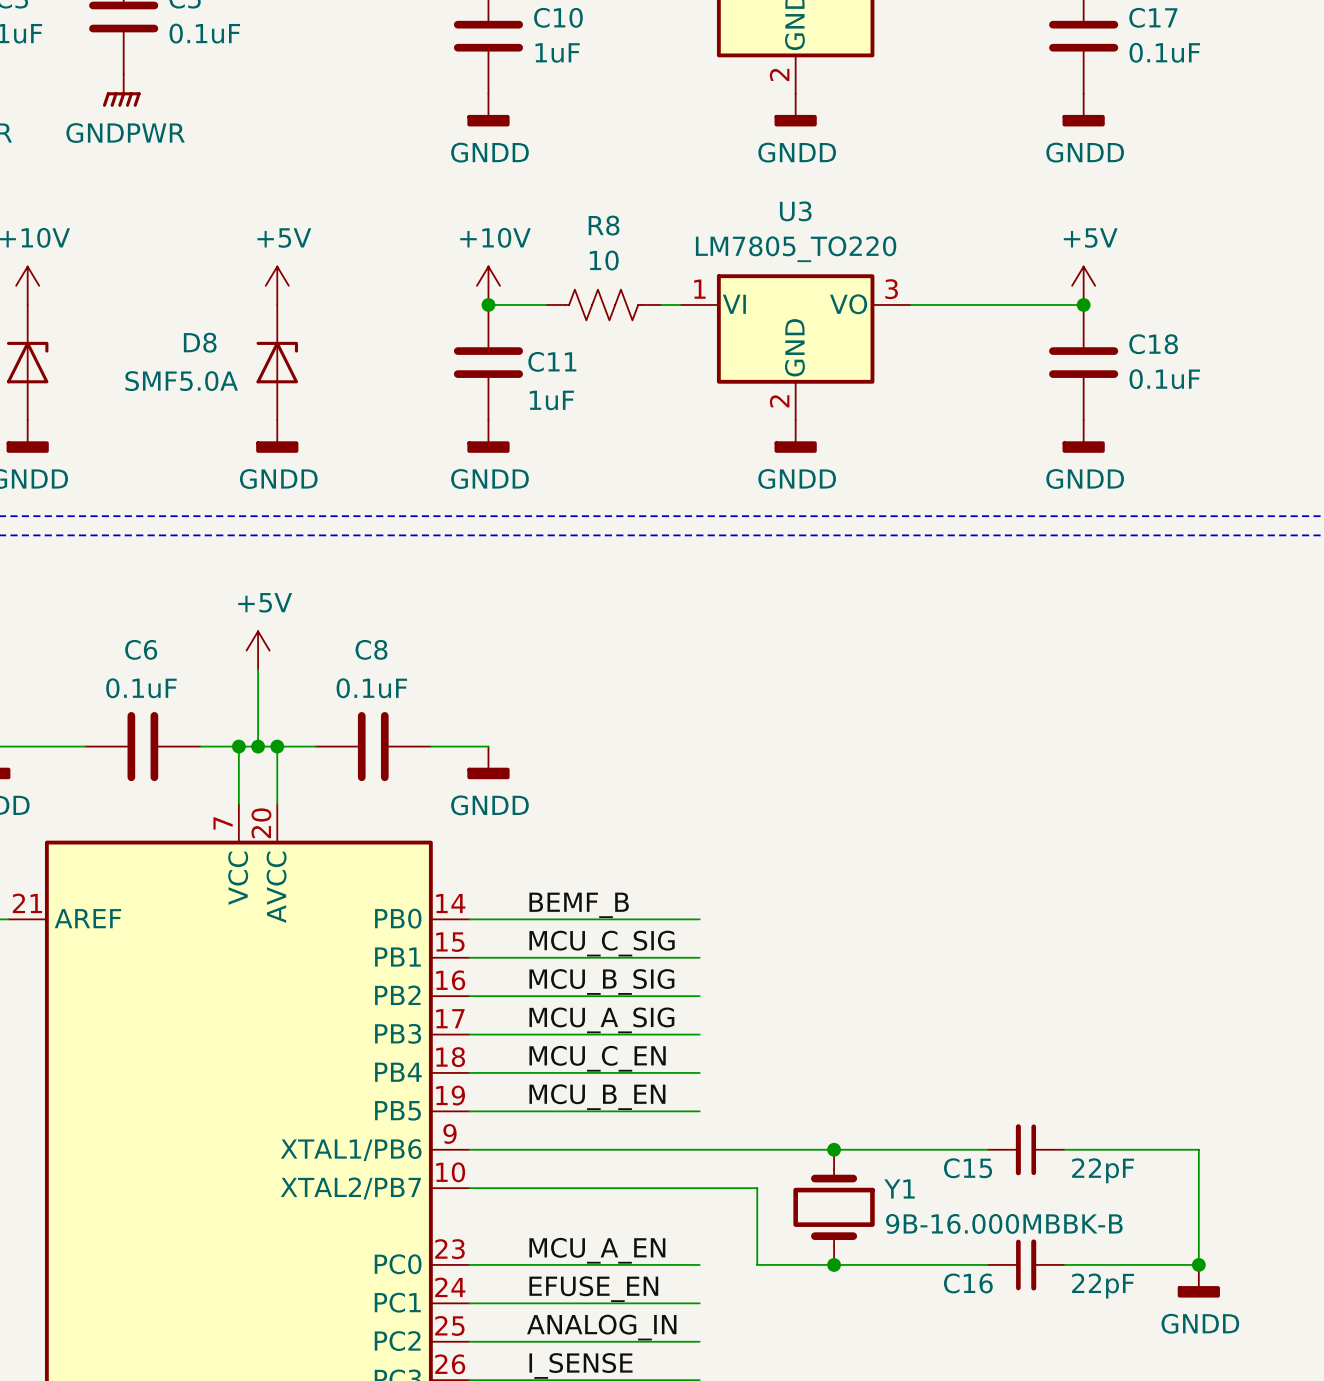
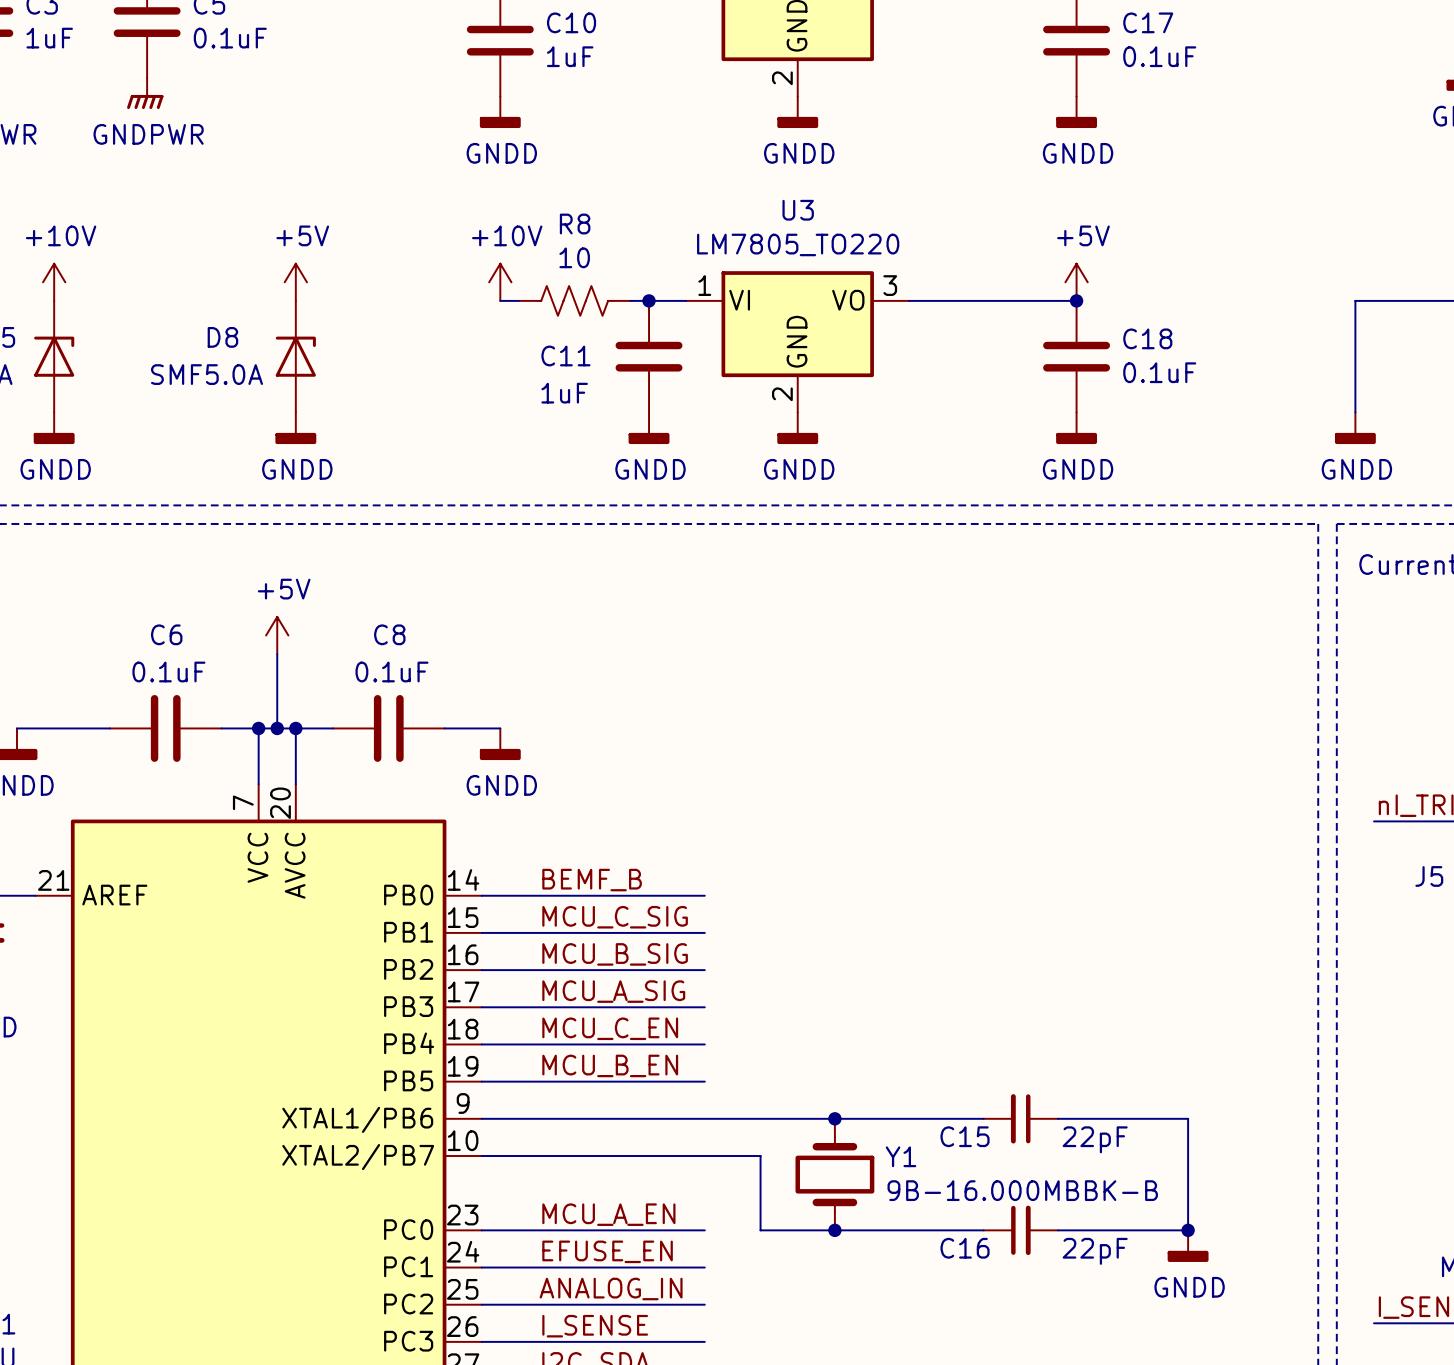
junction: (488, 304) -> none
R8 position: (603, 304) -> (574, 300)
junction: none -> (649, 300)
C11 position: (488, 362) -> (649, 356)
power symbol position: GNDD (488, 436) -> GNDD (649, 428)

